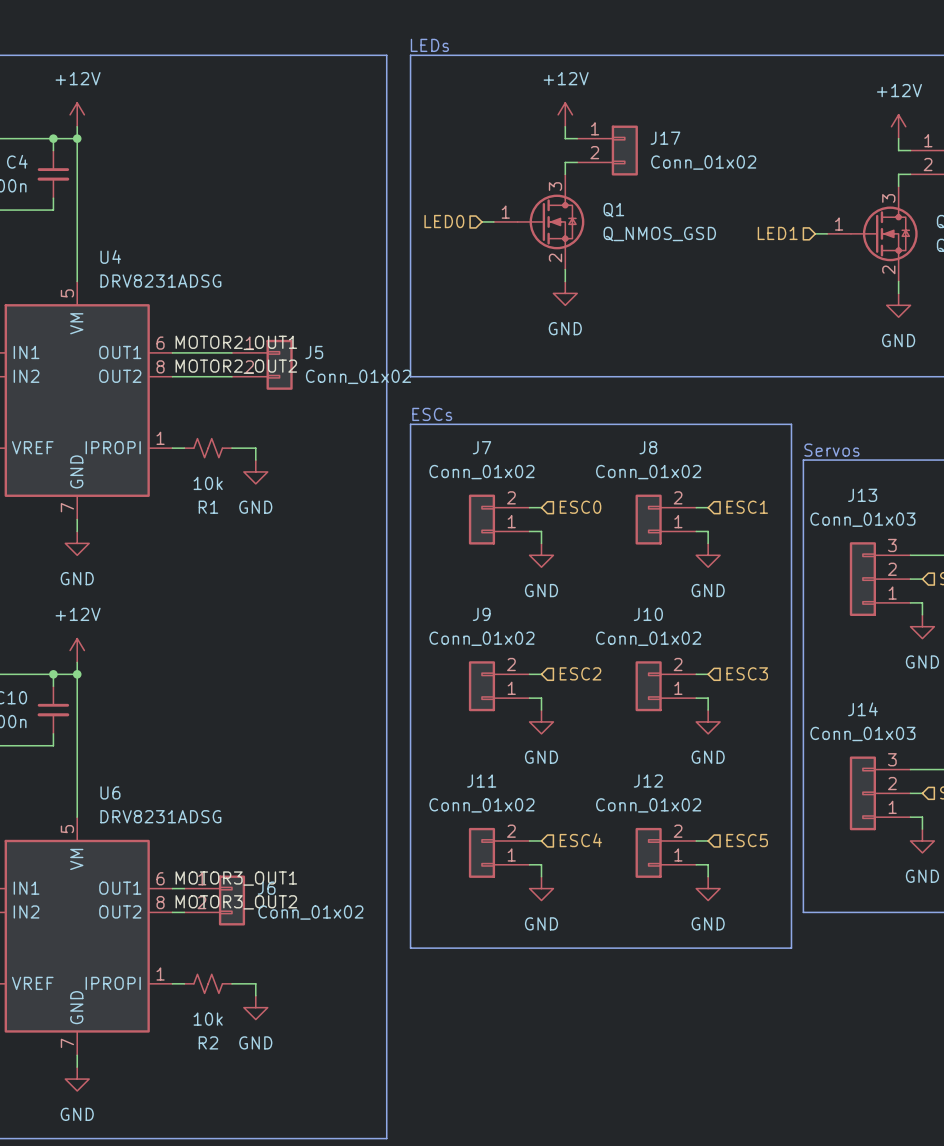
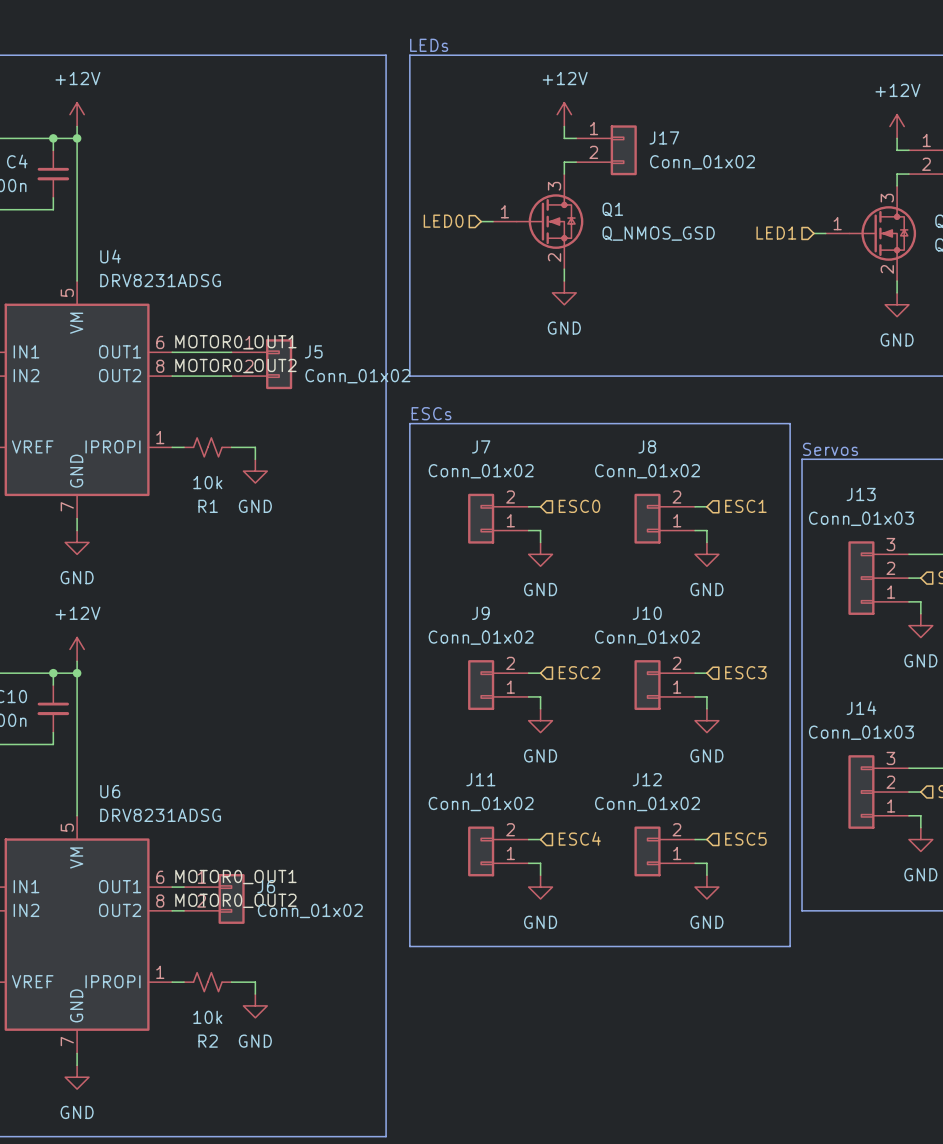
label: MOTOR2_OUT1 (236, 342) -> MOTOR0_OUT1 (235, 342)
label: MOTOR2_OUT2 (236, 366) -> MOTOR0_OUT2 (235, 366)
label: MOTOR3_OUT1 (236, 878) -> MOTOR0_OUT1 (235, 877)
label: MOTOR3_OUT2 (236, 902) -> MOTOR0_OUT2 (235, 900)

